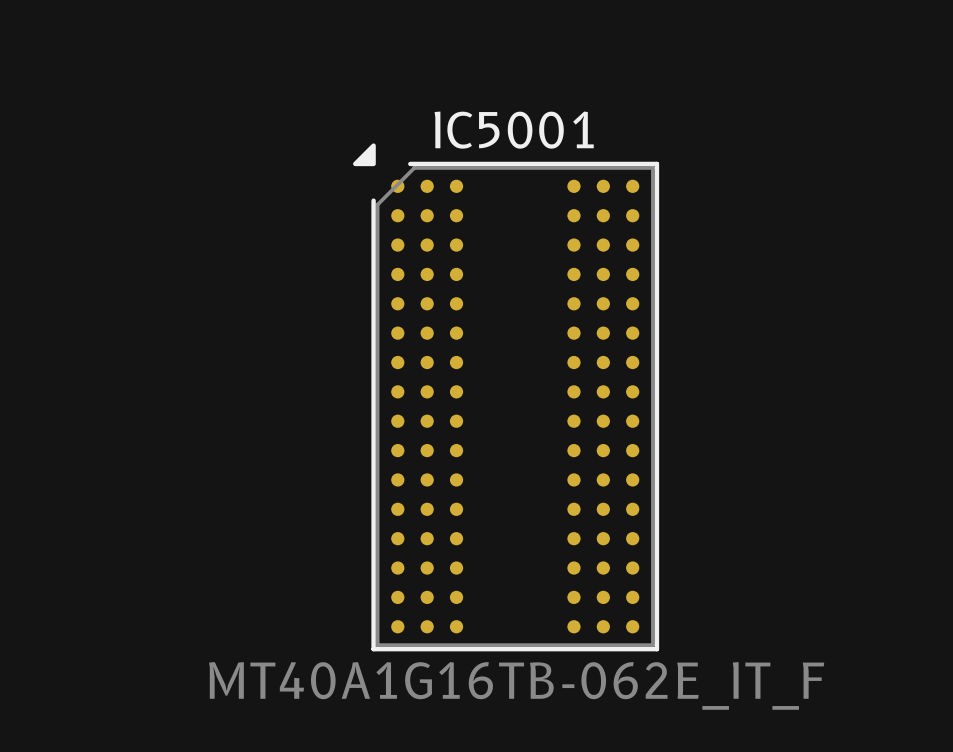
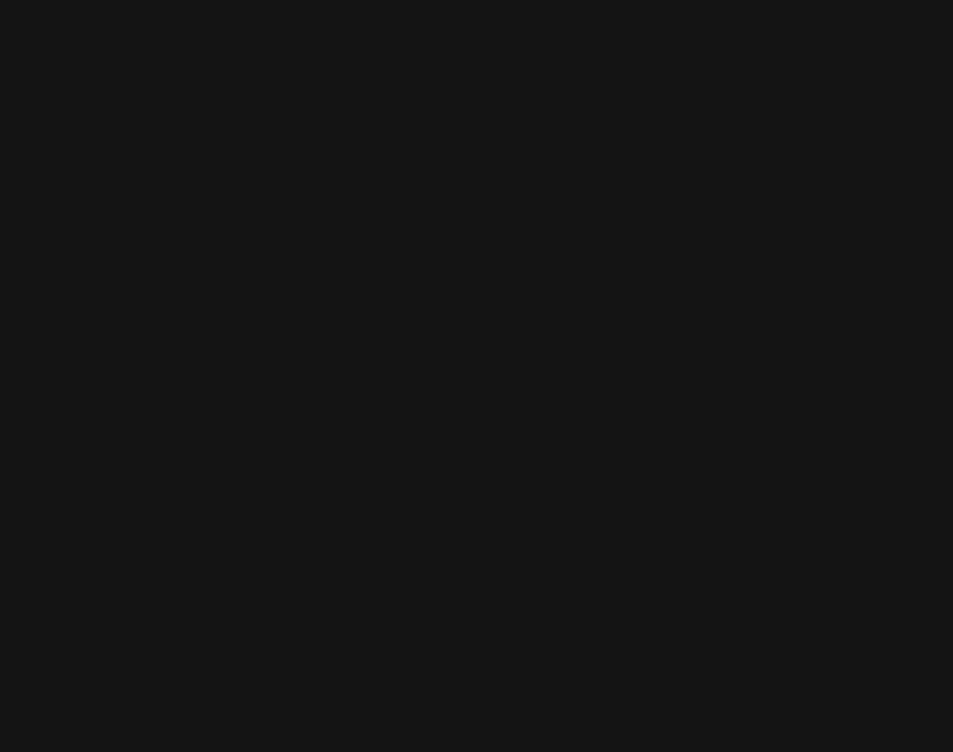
IC5001: MT40A1G16TB-062E_IT_F (506, 397) -> none

